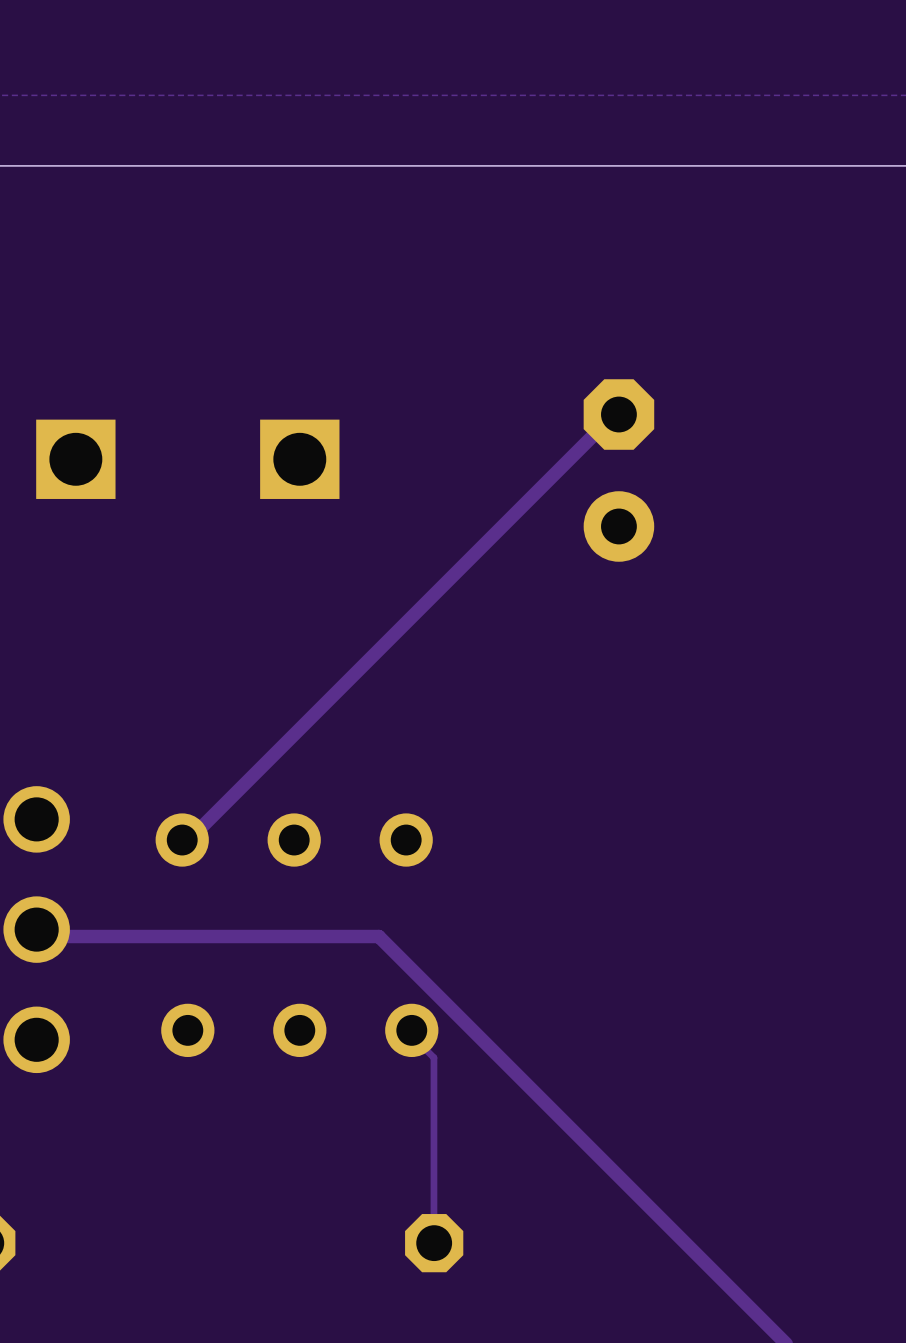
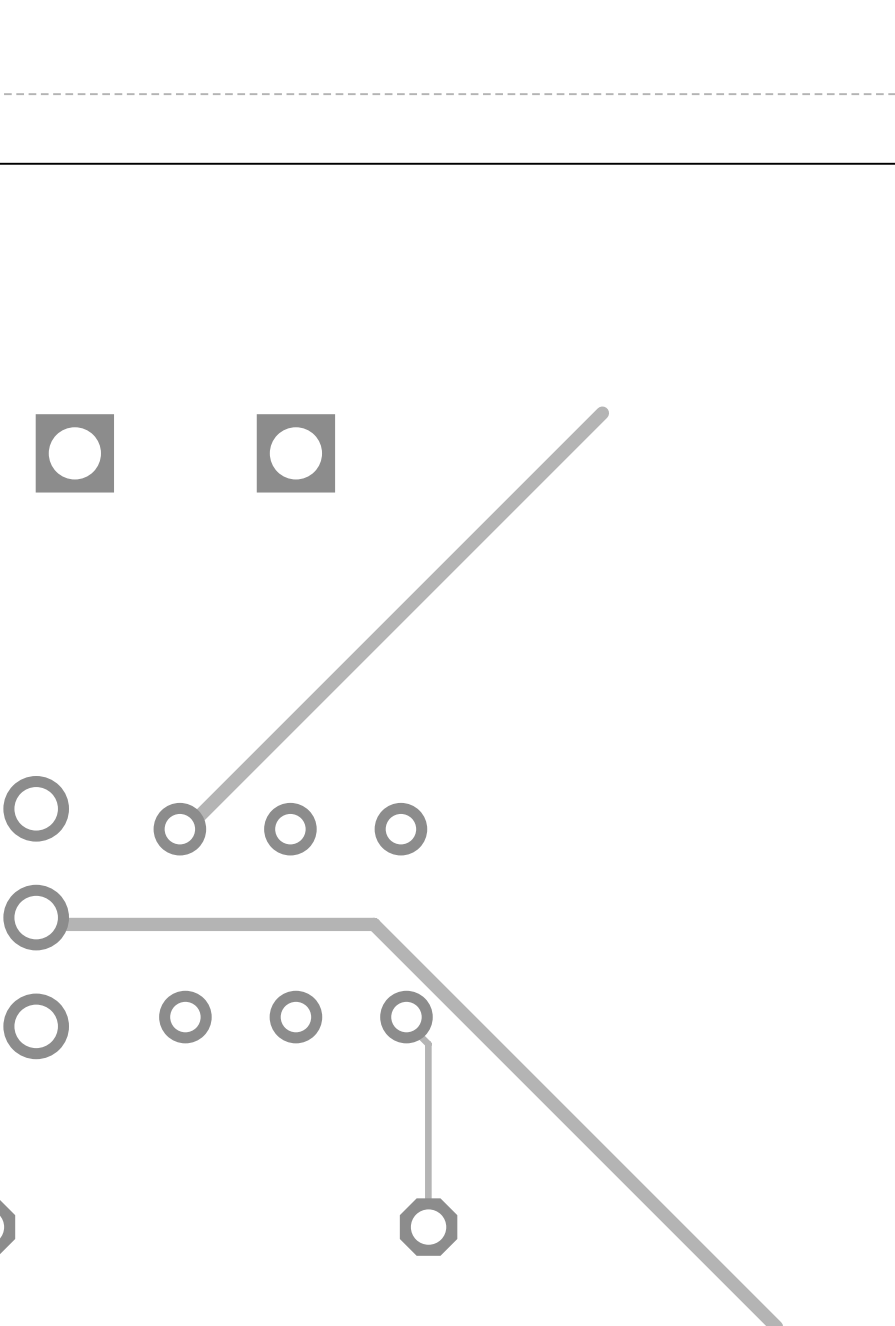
part: (618, 470) -> none

